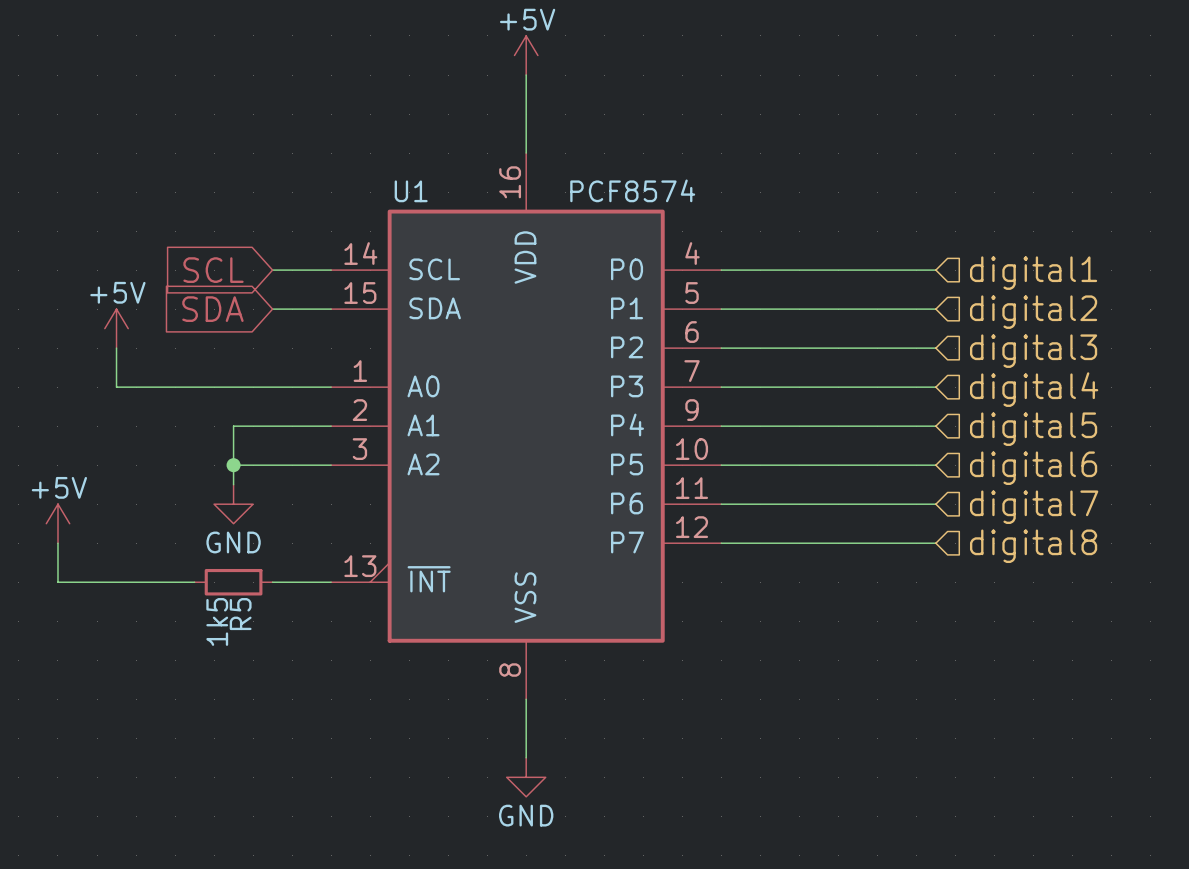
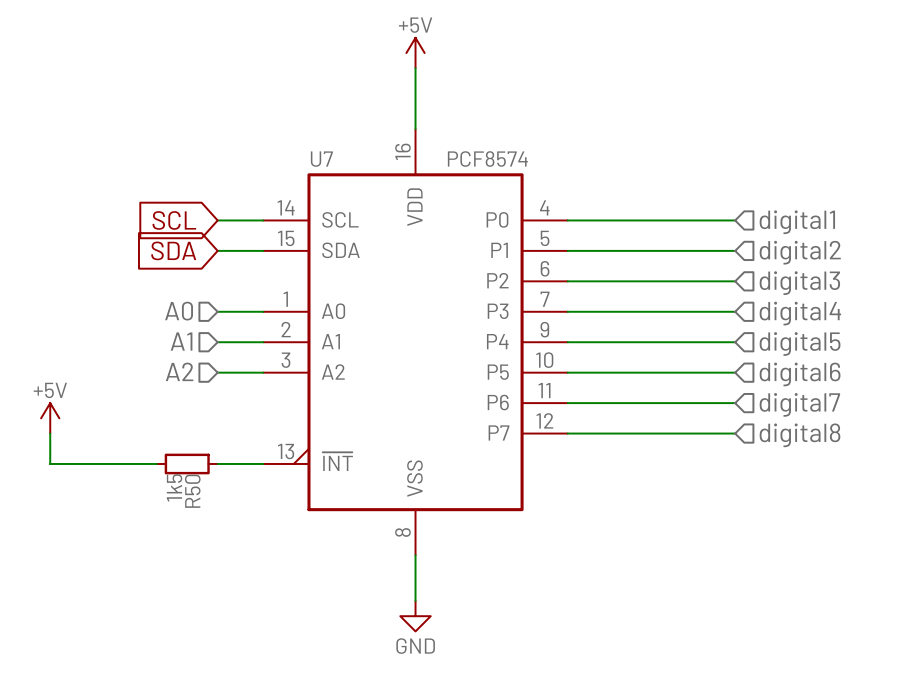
U1 name: U1 (411, 191) -> U7 (321, 159)
power symbol: +5V (116, 328) -> none
wire: (116, 348) (116, 387) (272, 387) -> none
hierarchical label: none -> A0 (179, 311)
hierarchical label: none -> A1 (181, 341)
wire: (272, 426) (233, 426) (233, 484) -> none
hierarchical label: none -> A2 (179, 371)
wire: (233, 465) (272, 465) -> none
junction: (233, 465) -> none
power symbol: GND (233, 504) -> none
R5 name: R5 (240, 614) -> R50 (192, 491)

